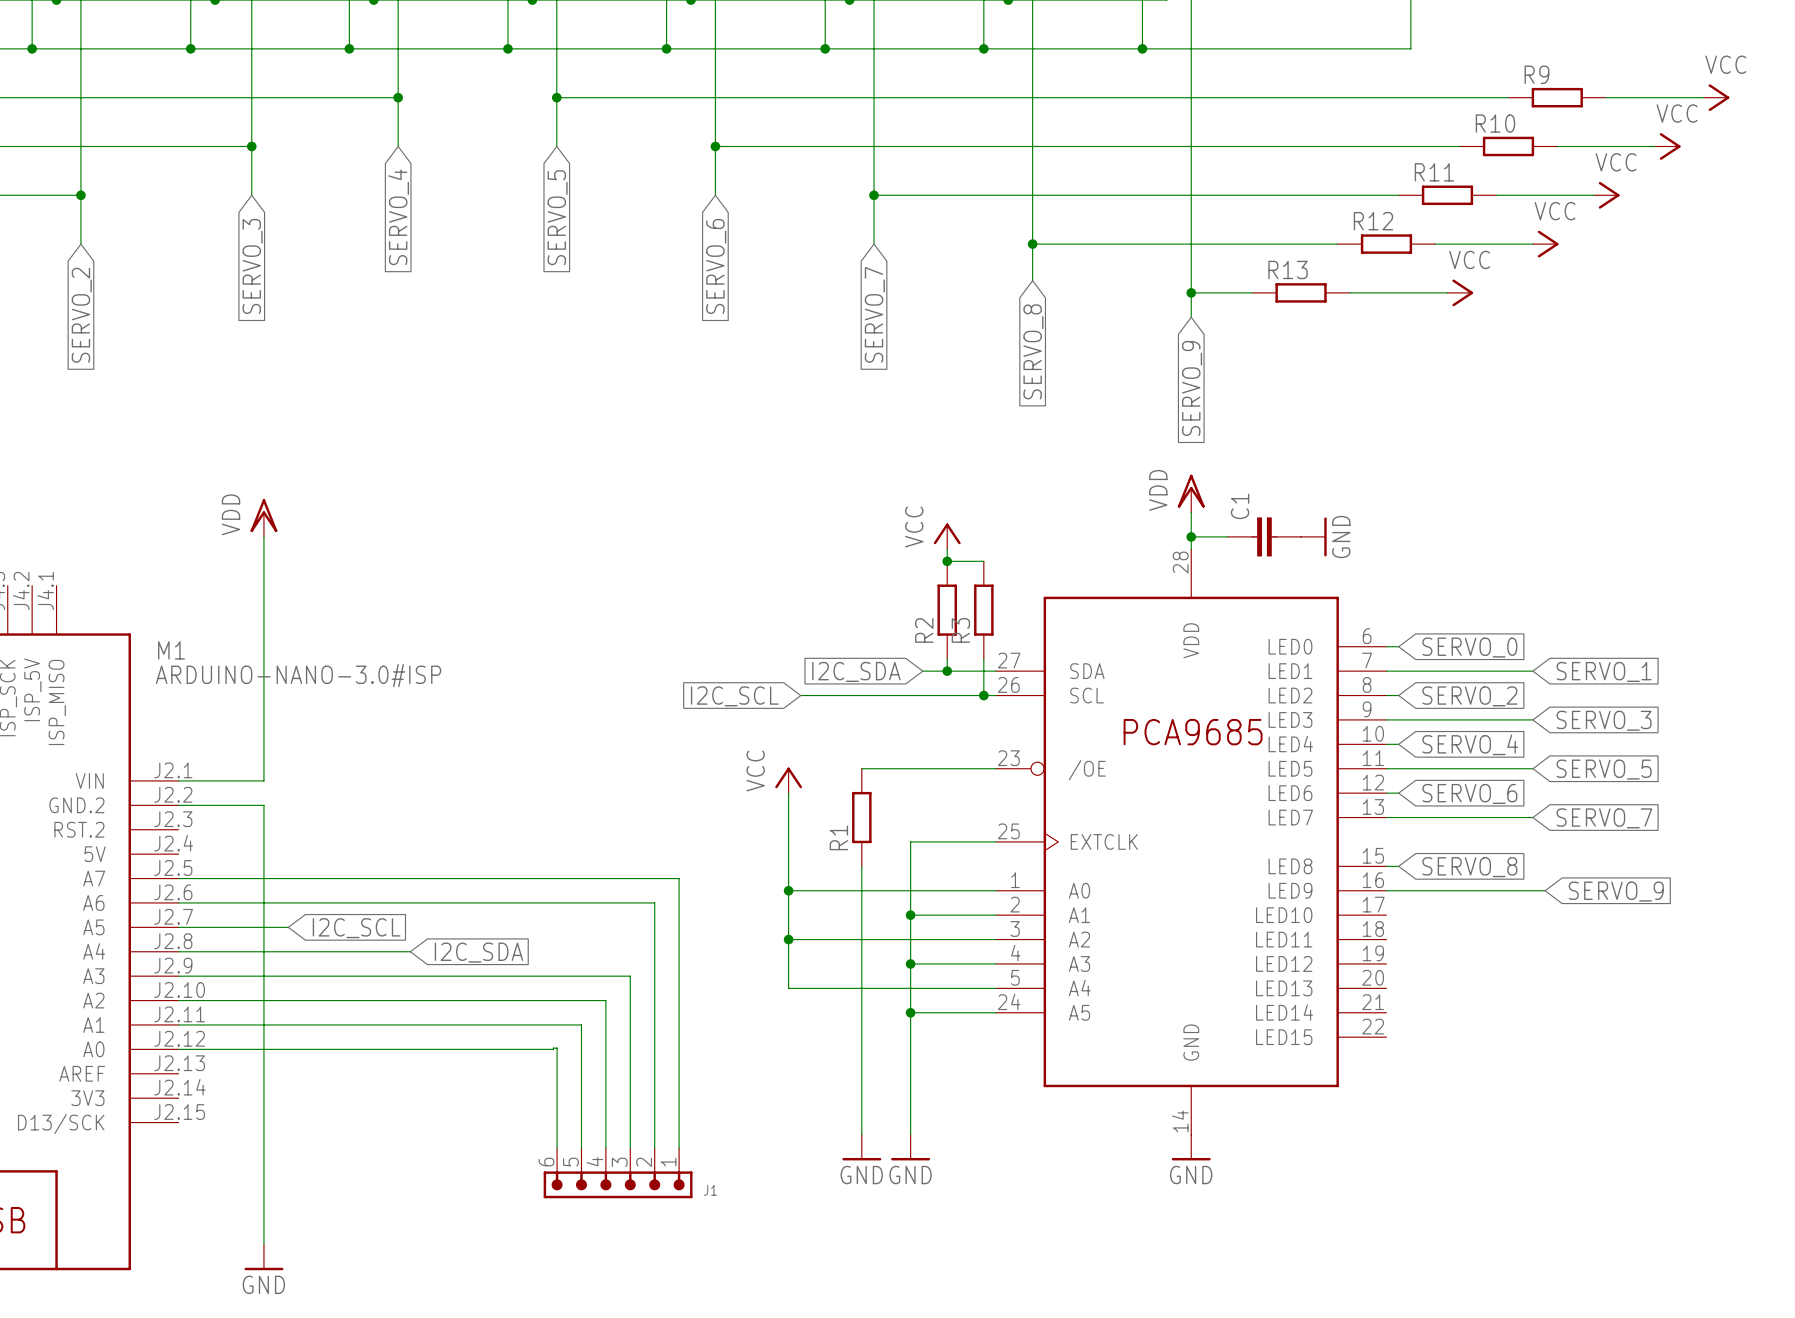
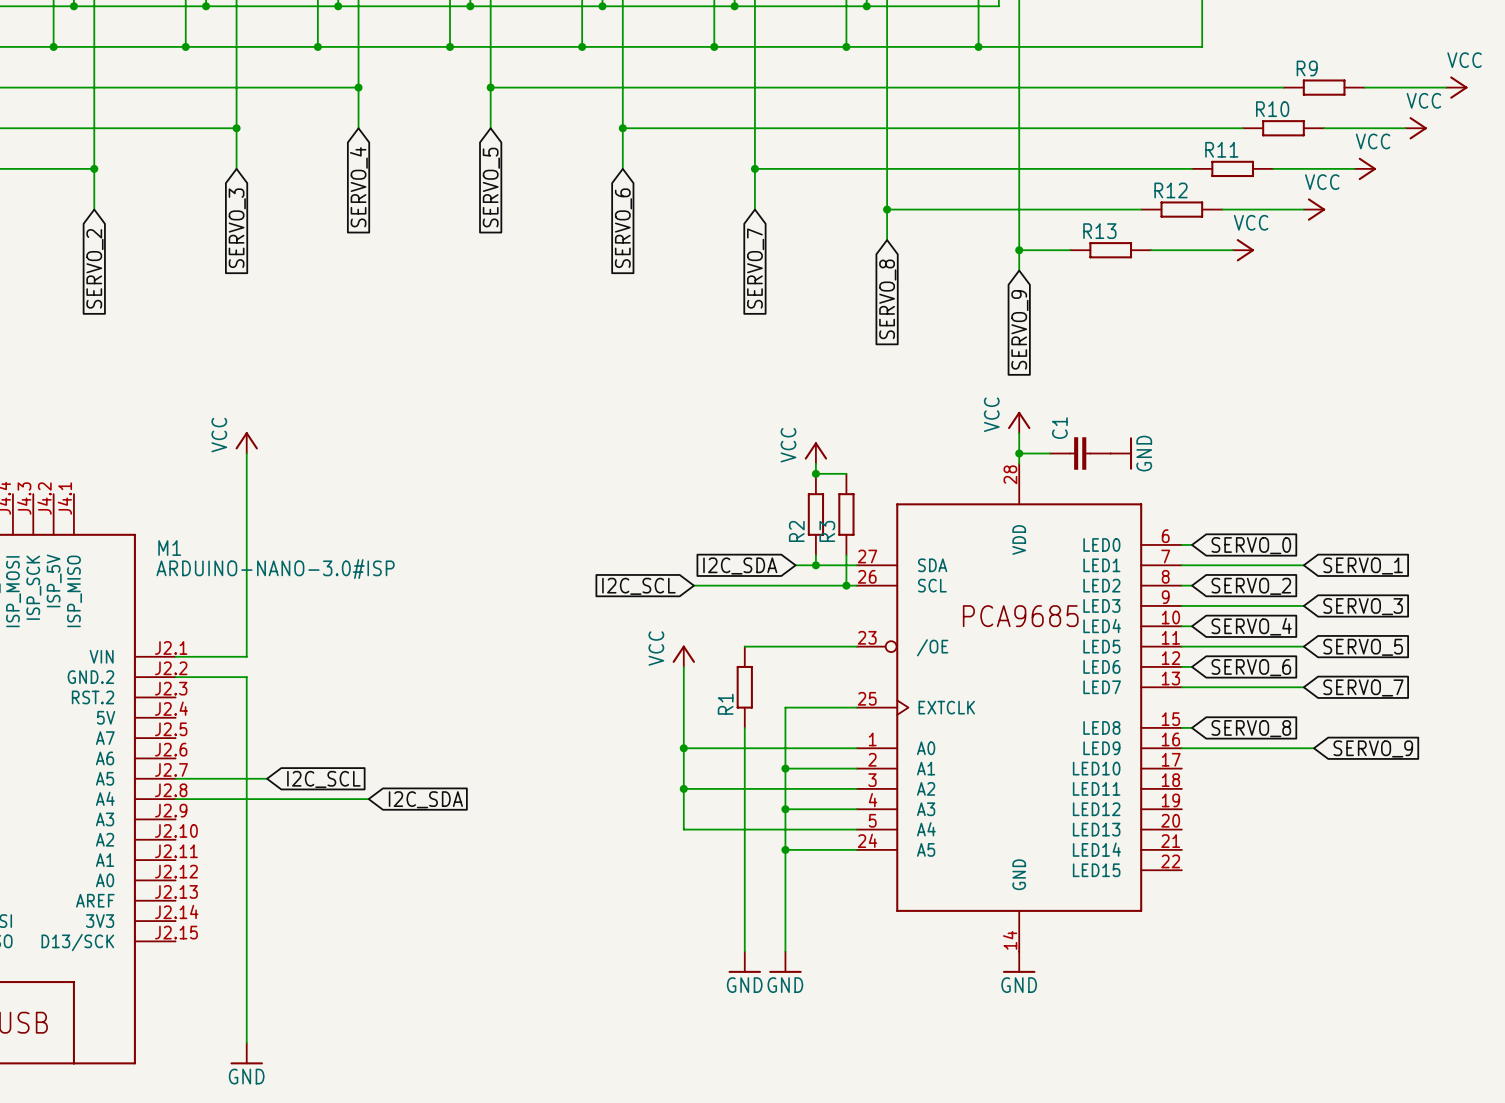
power symbol: VDD (1191, 493) -> VCC (1019, 422)
power symbol: VDD (263, 518) -> VCC (246, 442)
wire: (178, 878) (679, 878) (679, 1148) -> none
wire: (178, 902) (654, 902) (654, 1148) -> none
wire: (178, 976) (630, 976) (630, 1148) -> none
wire: (178, 1000) (605, 1000) (605, 1148) -> none
wire: (178, 1024) (581, 1024) (581, 1148) -> none
wire: (178, 1049) (557, 1048) (557, 1148) -> none
J1: (618, 1173) -> none

